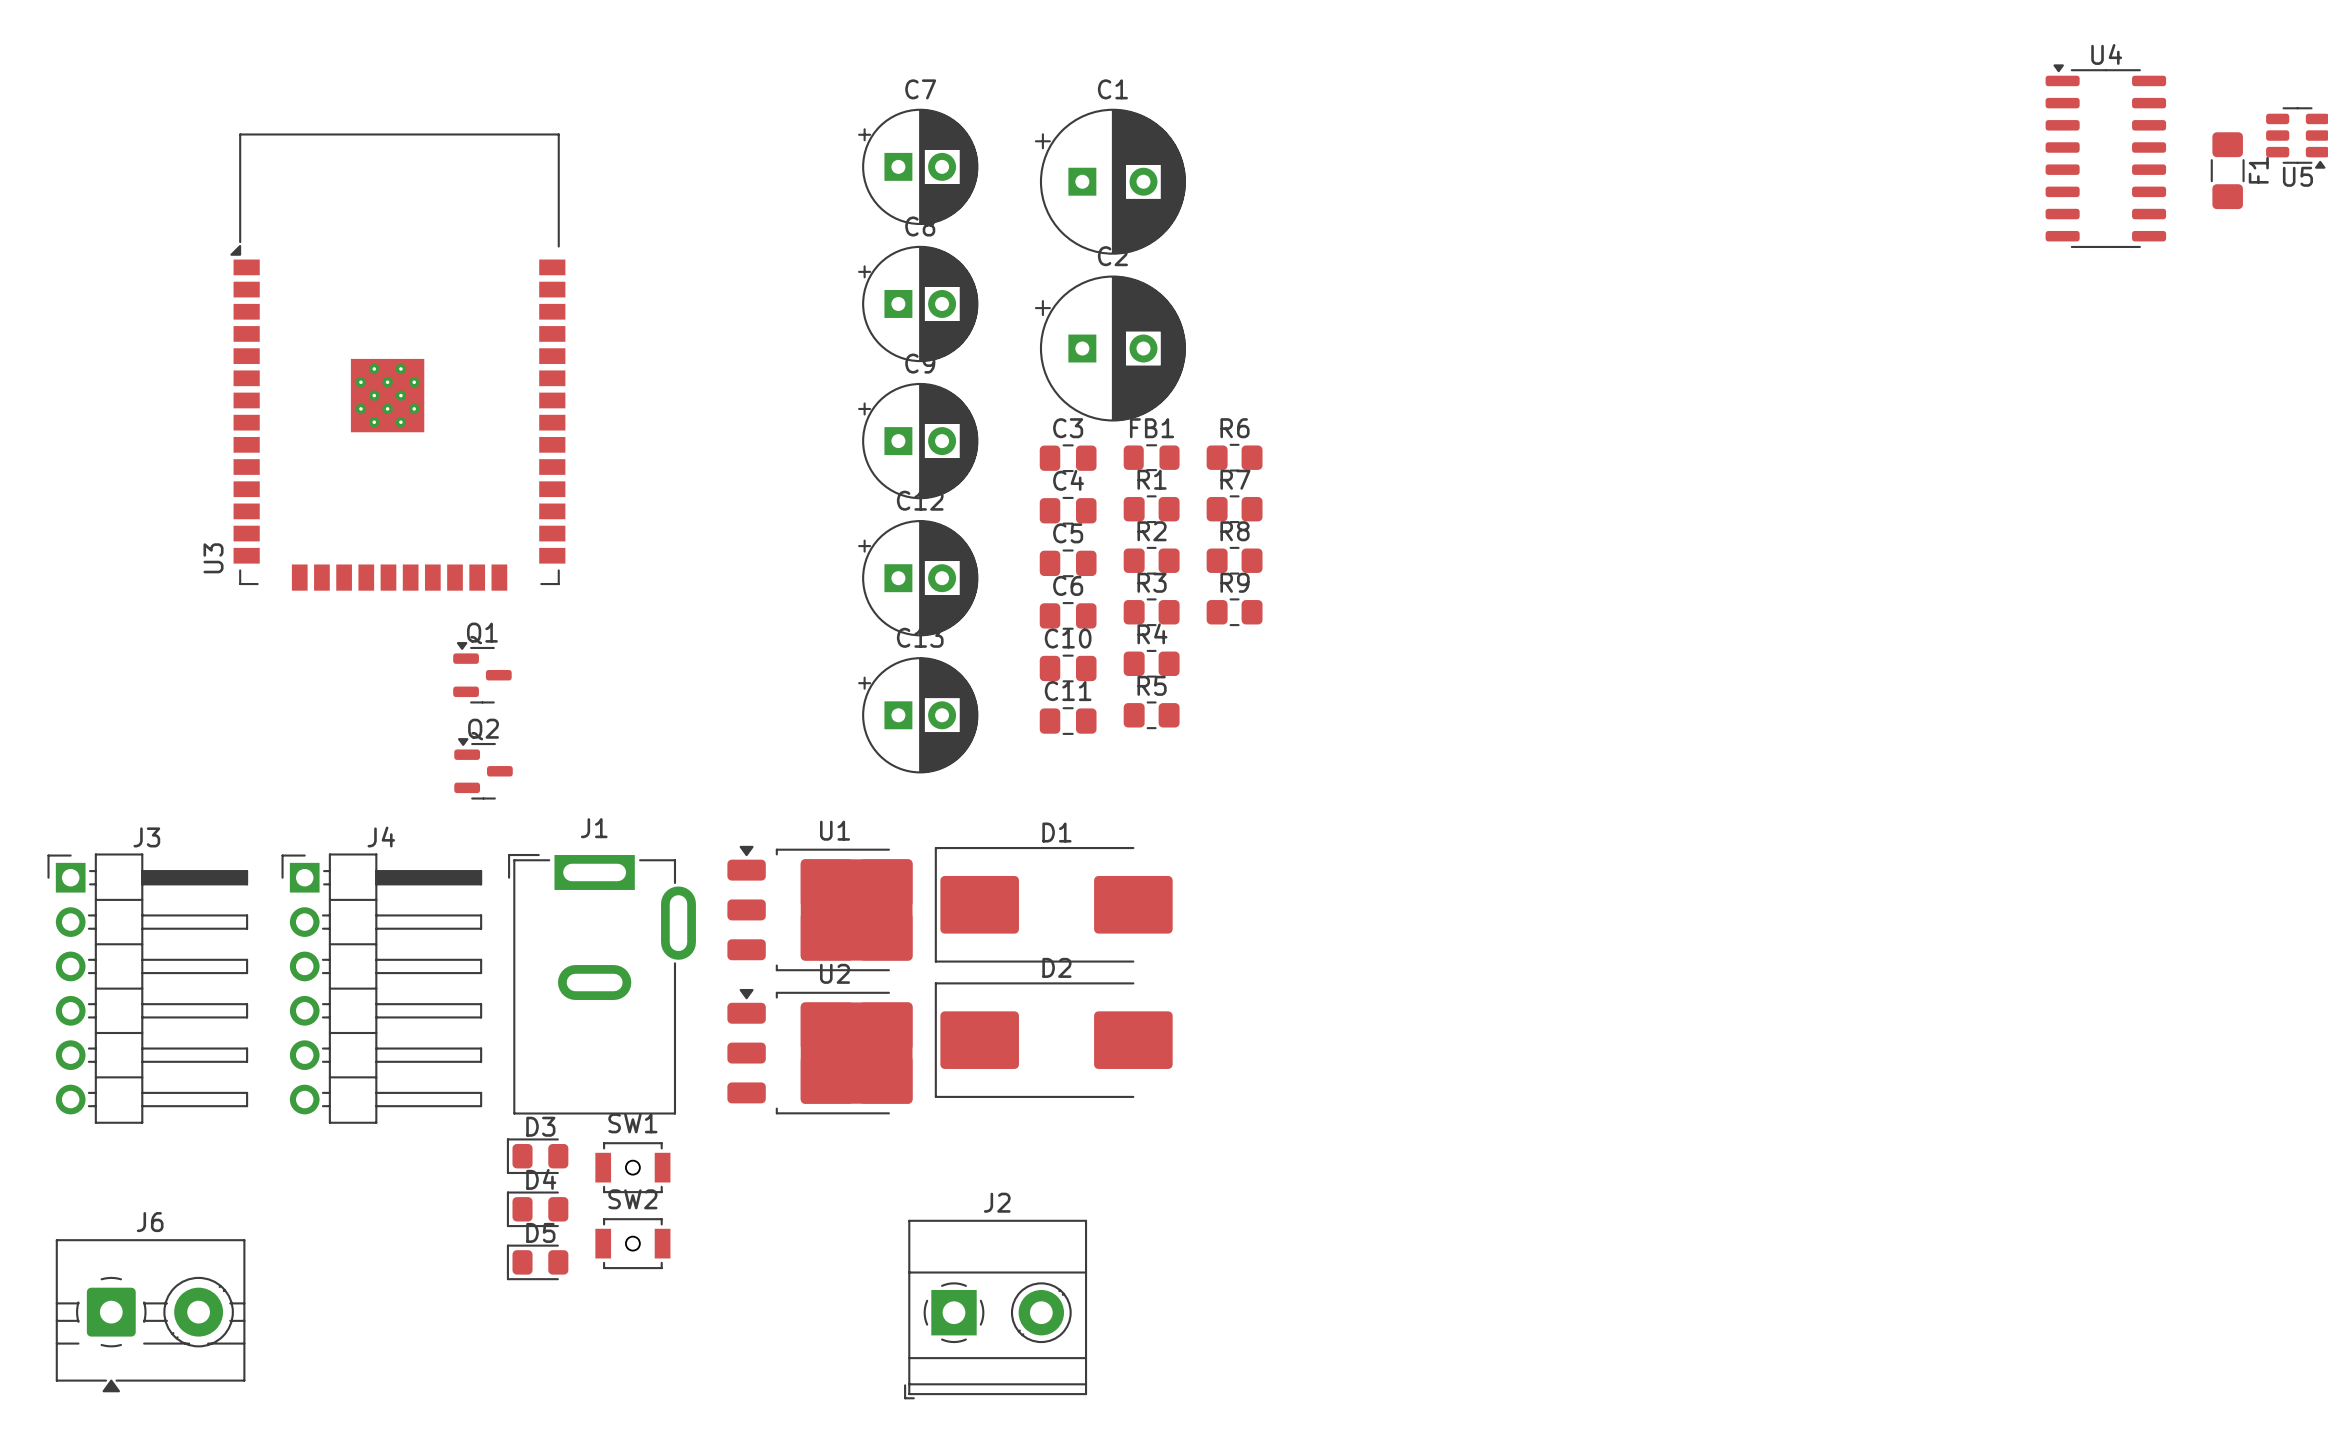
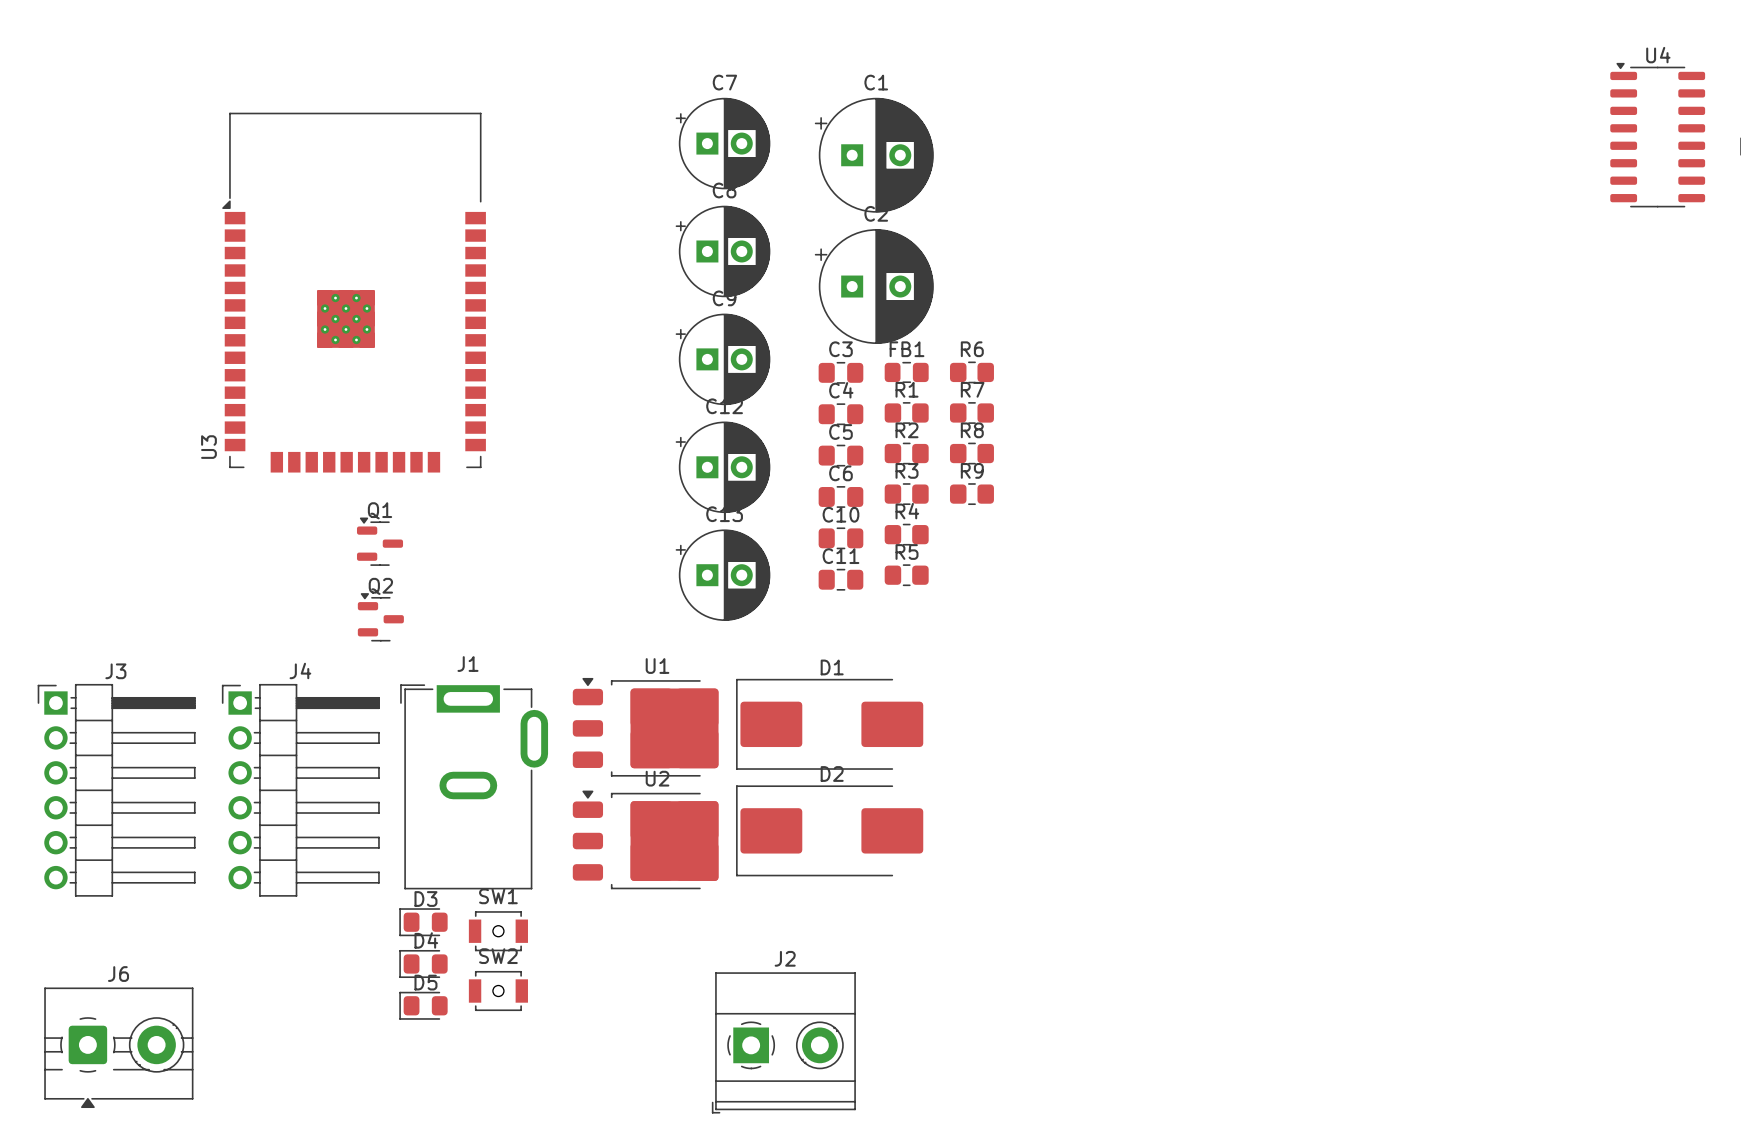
U3 position: (397, 362) -> (354, 292)

